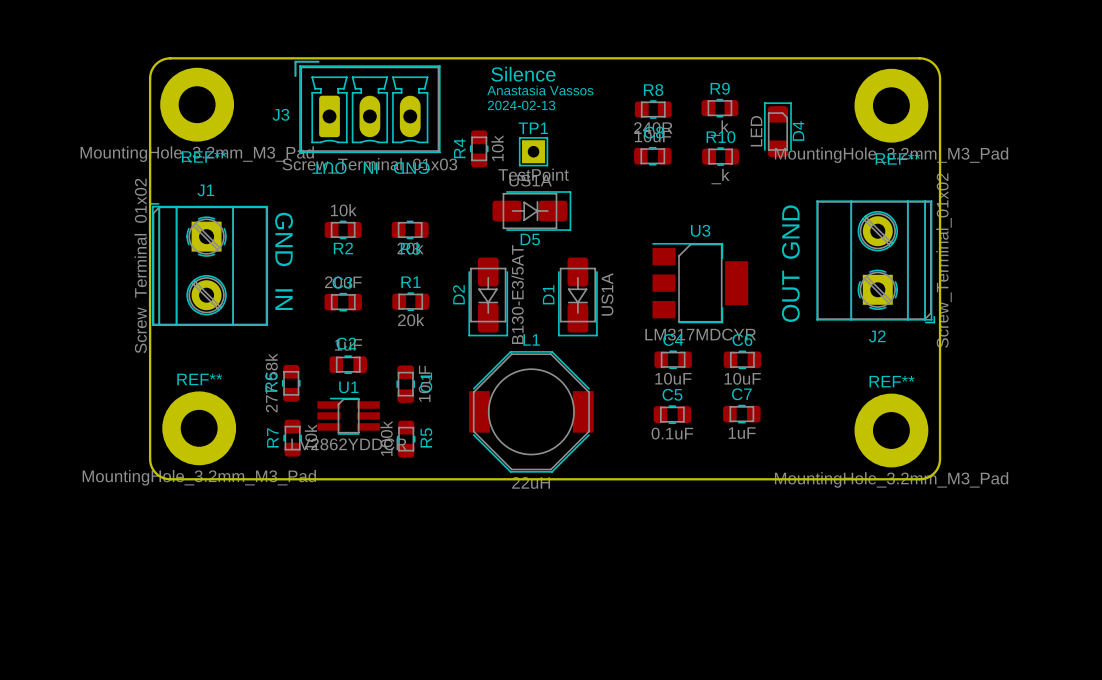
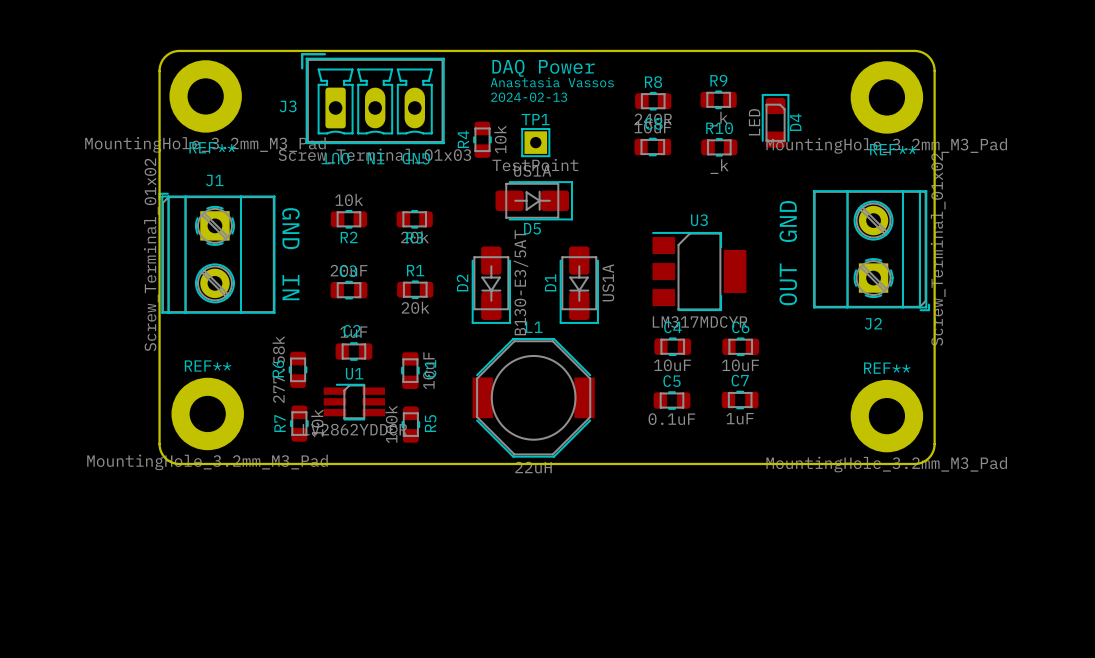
text: Silence (523, 74) -> none
text: none -> DAQ Power (543, 68)

